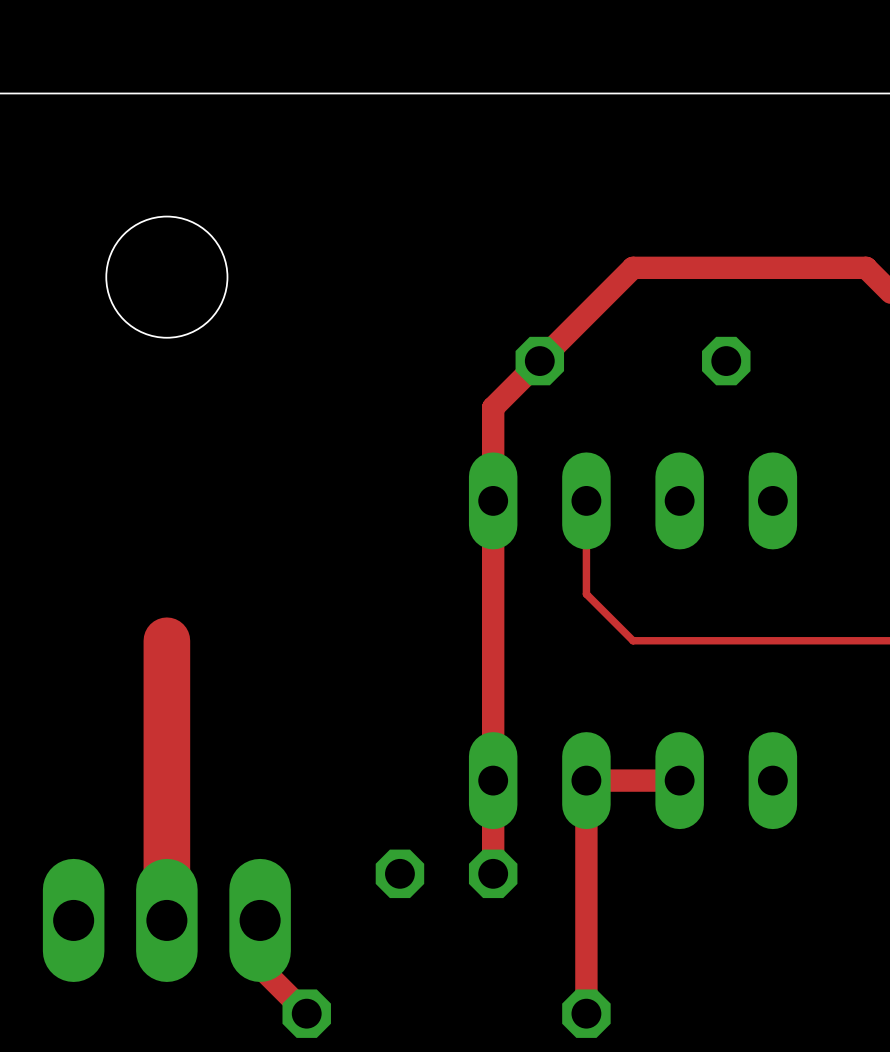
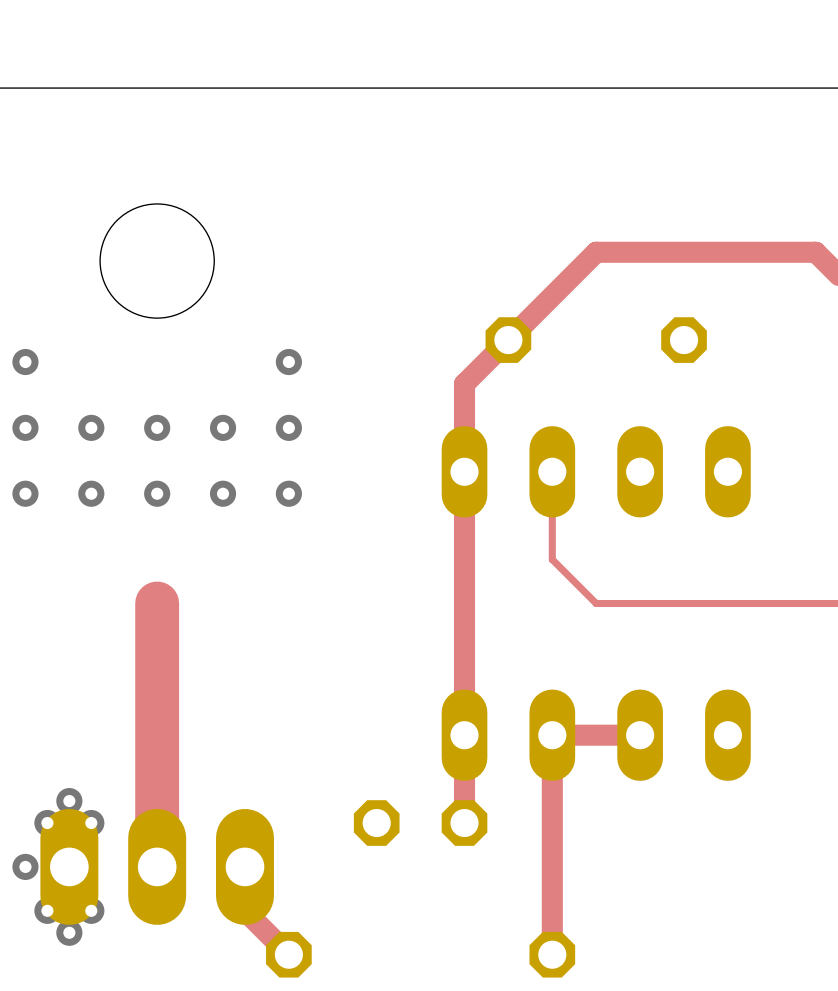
via: none -> (25, 362)
via: none -> (288, 362)
via: none -> (25, 427)
via: none -> (91, 427)
via: none -> (157, 427)
via: none -> (223, 427)
via: none -> (288, 427)
via: none -> (25, 493)
via: none -> (91, 493)
via: none -> (157, 493)
via: none -> (223, 493)
via: none -> (288, 493)
via: none -> (69, 801)
via: none -> (47, 823)
via: none -> (91, 823)
via: none -> (25, 866)
via: none -> (47, 910)
via: none -> (91, 910)
via: none -> (69, 932)

